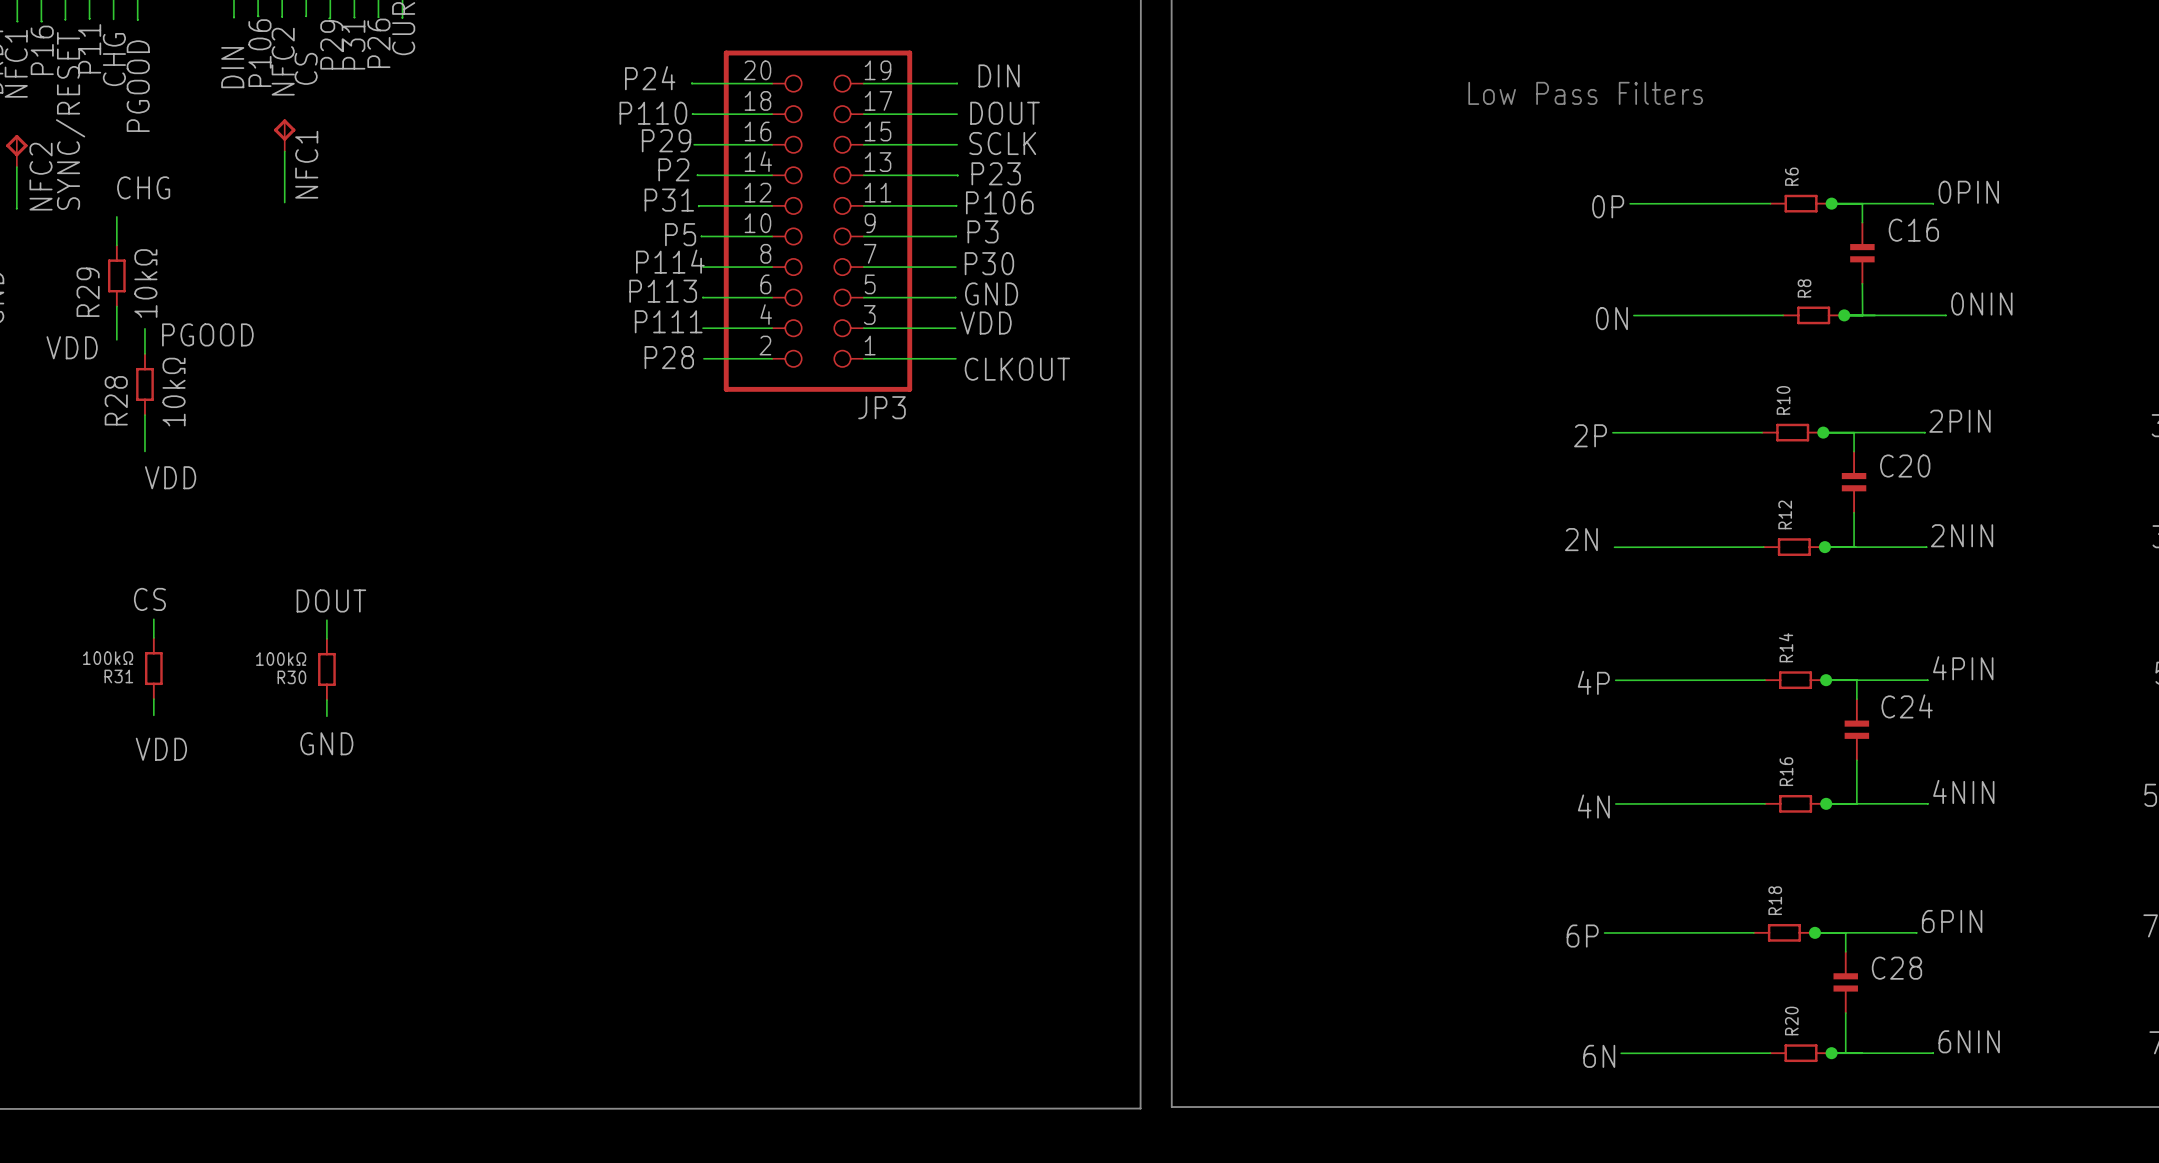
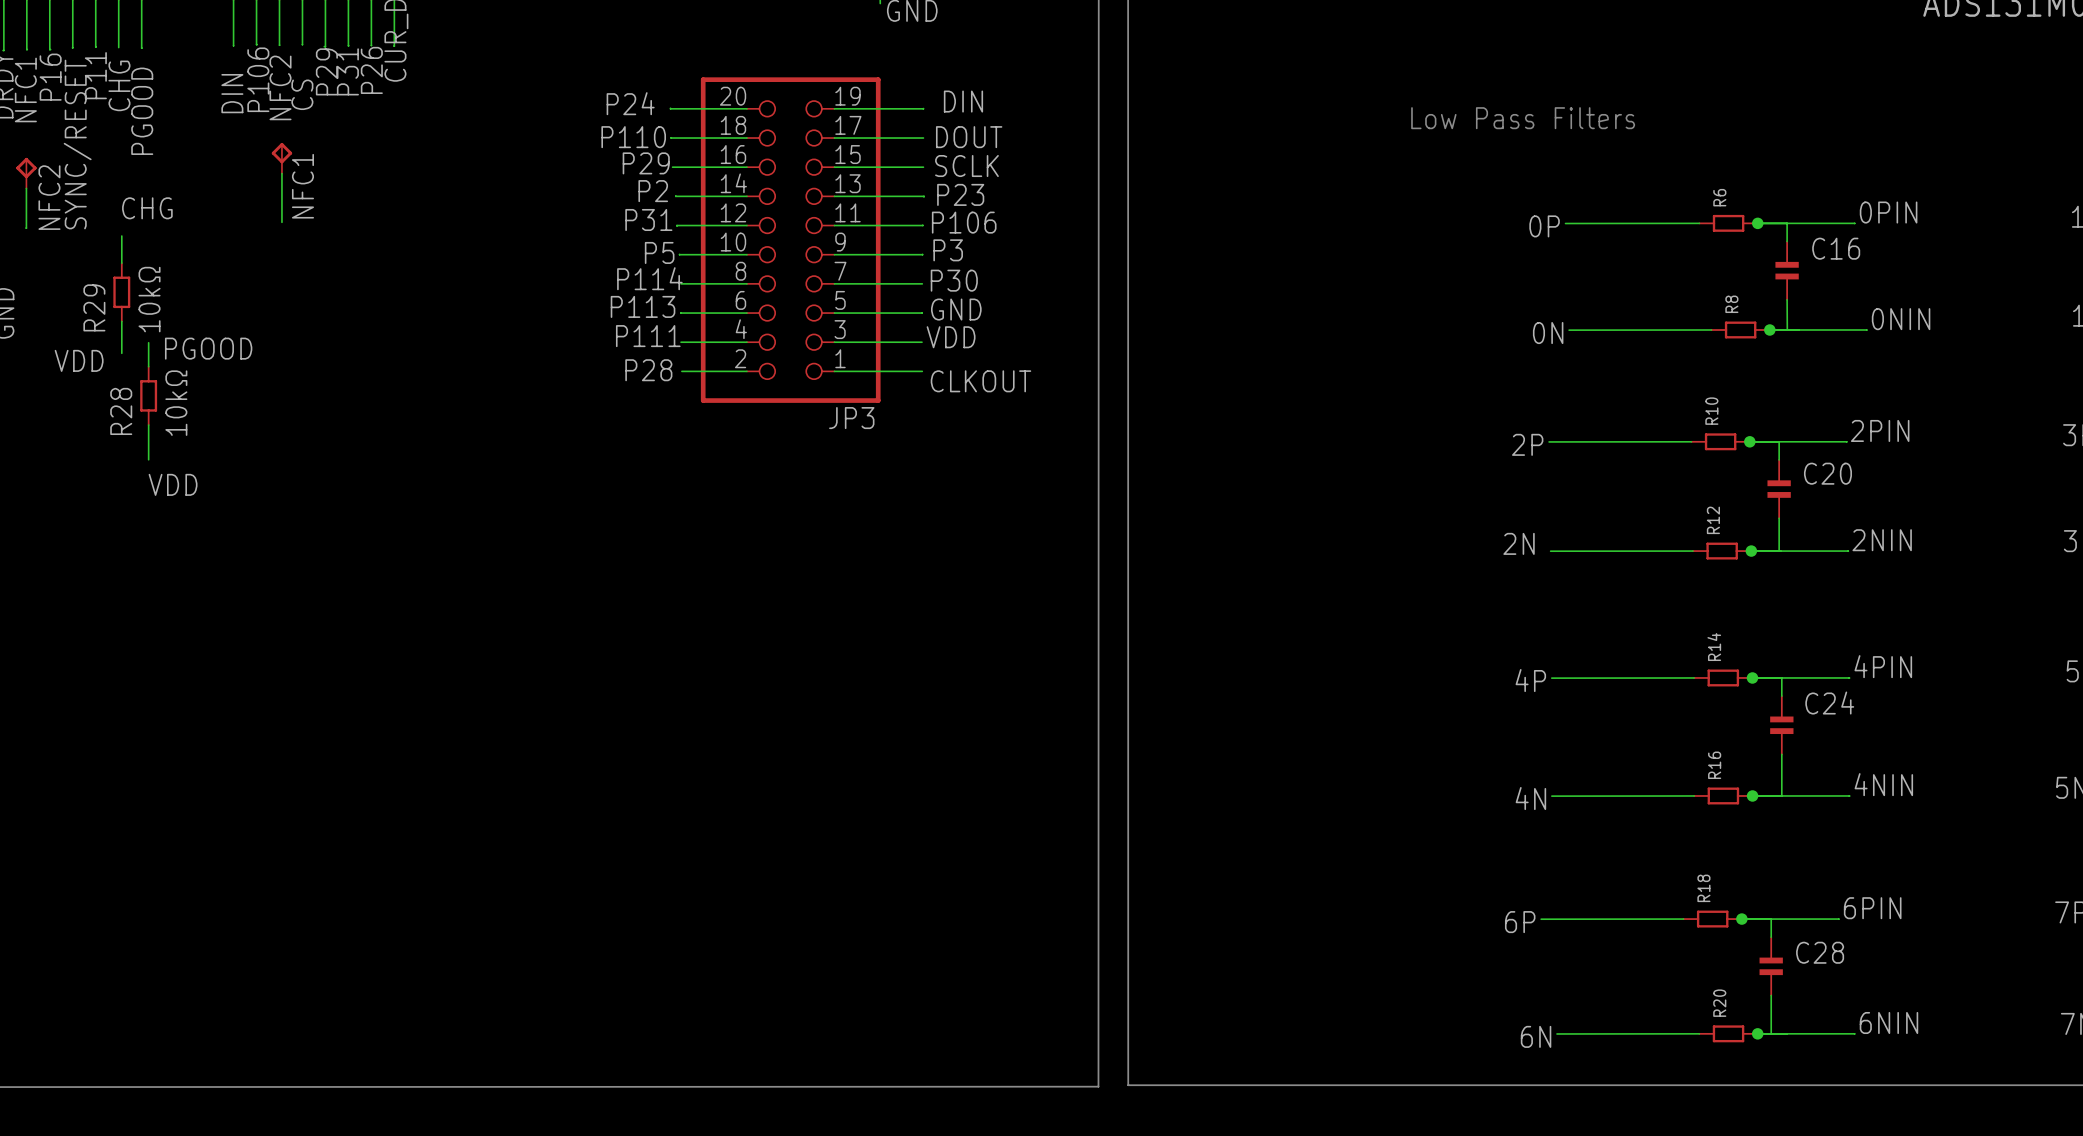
label: CS (149, 599) -> none
label: DOUT (331, 600) -> none
wire: (153, 619) (153, 637) -> none
wire: (326, 620) (326, 638) -> none
R31: 100kΩ (153, 668) -> none
R30: 100kΩ (326, 669) -> none
wire: (153, 699) (153, 715) -> none
wire: (326, 700) (326, 716) -> none
label: GND (326, 743) -> none
label: VDD (161, 749) -> none

